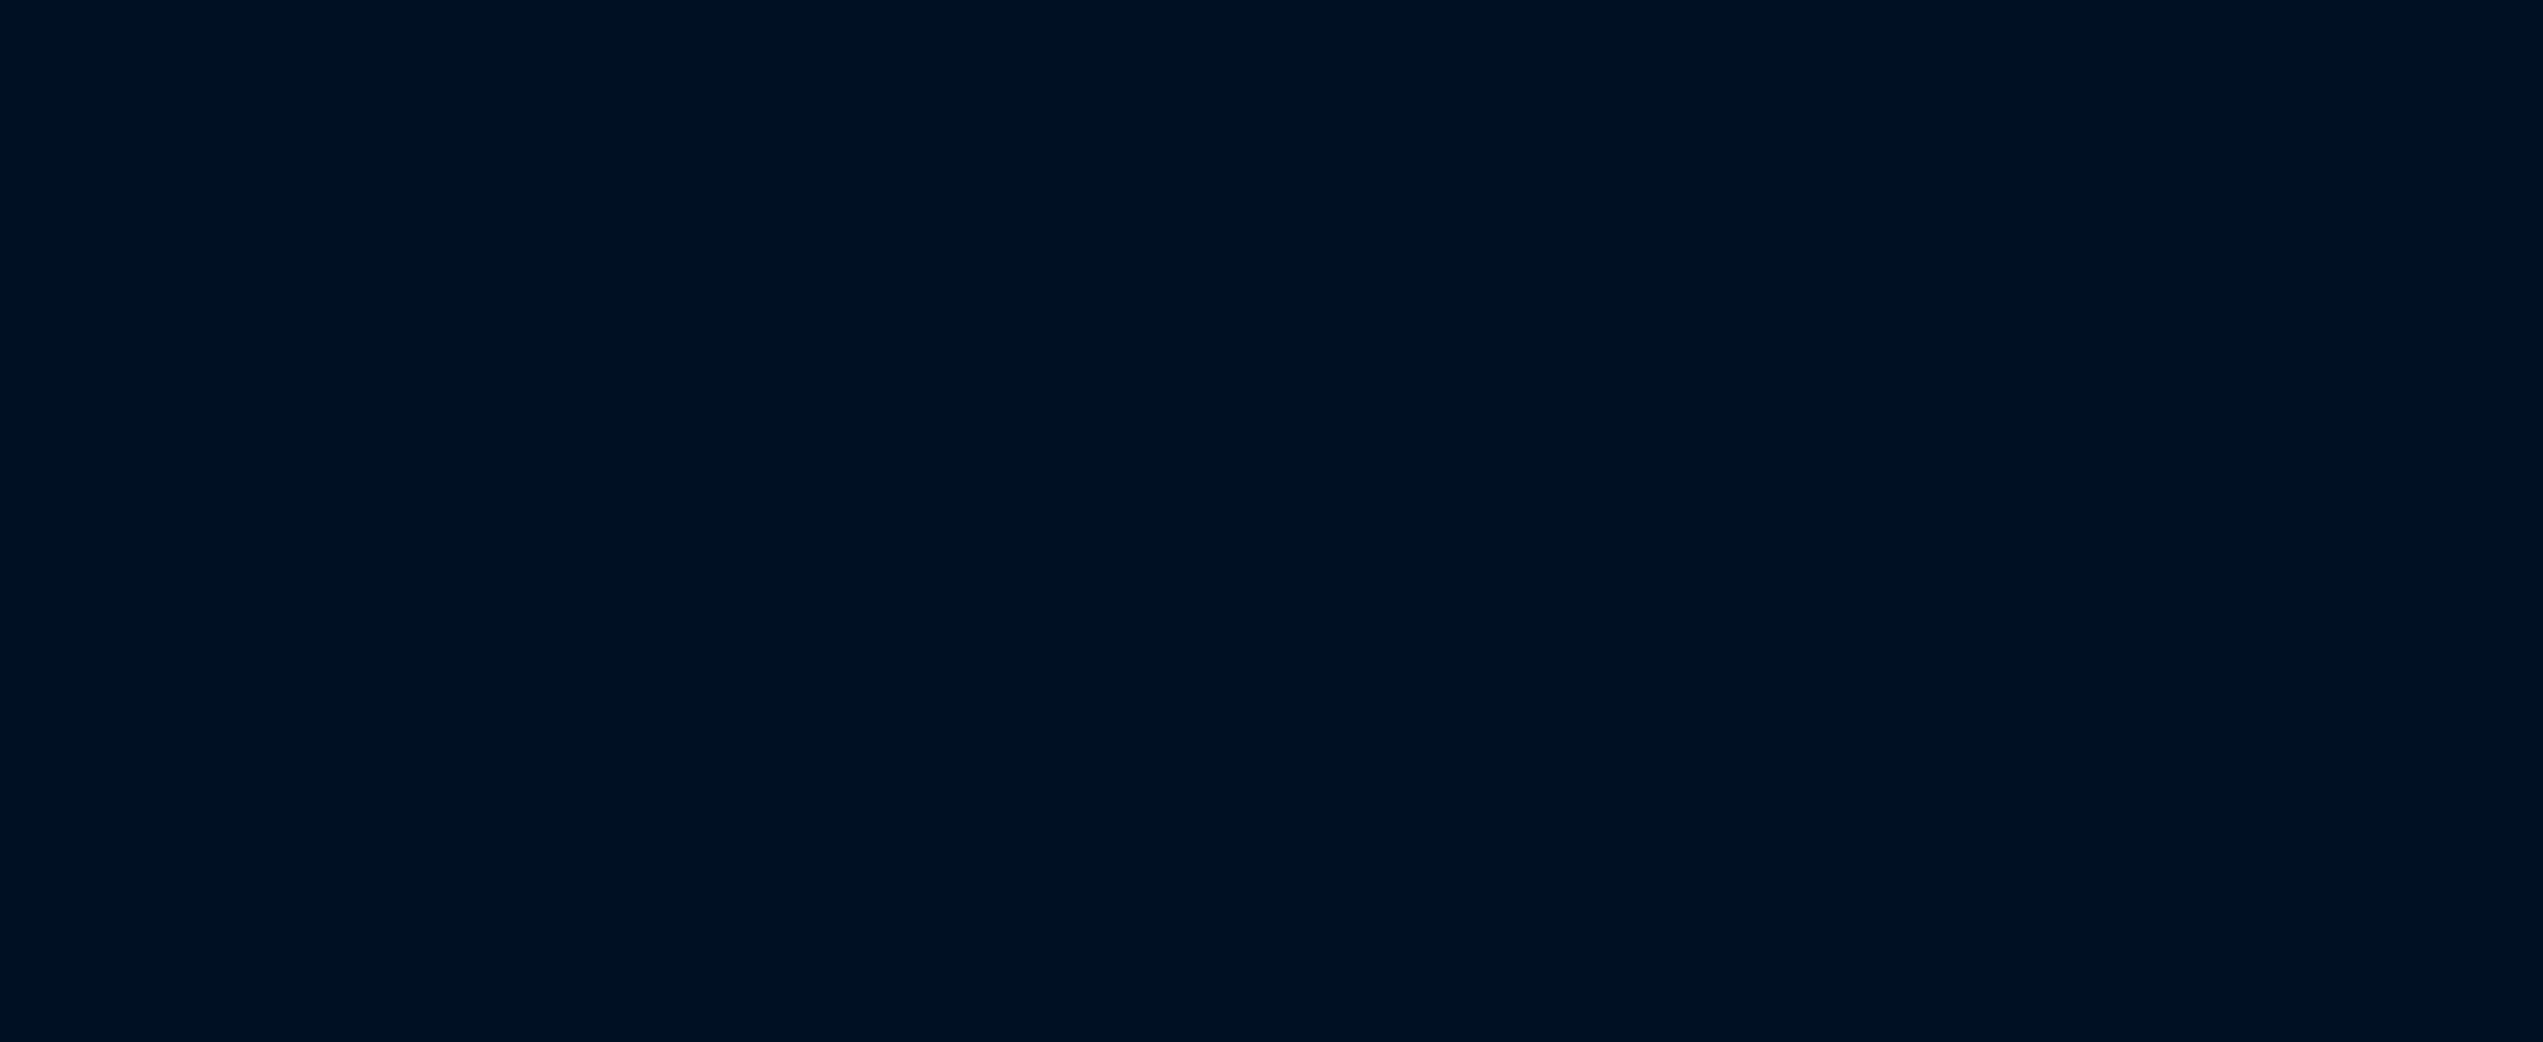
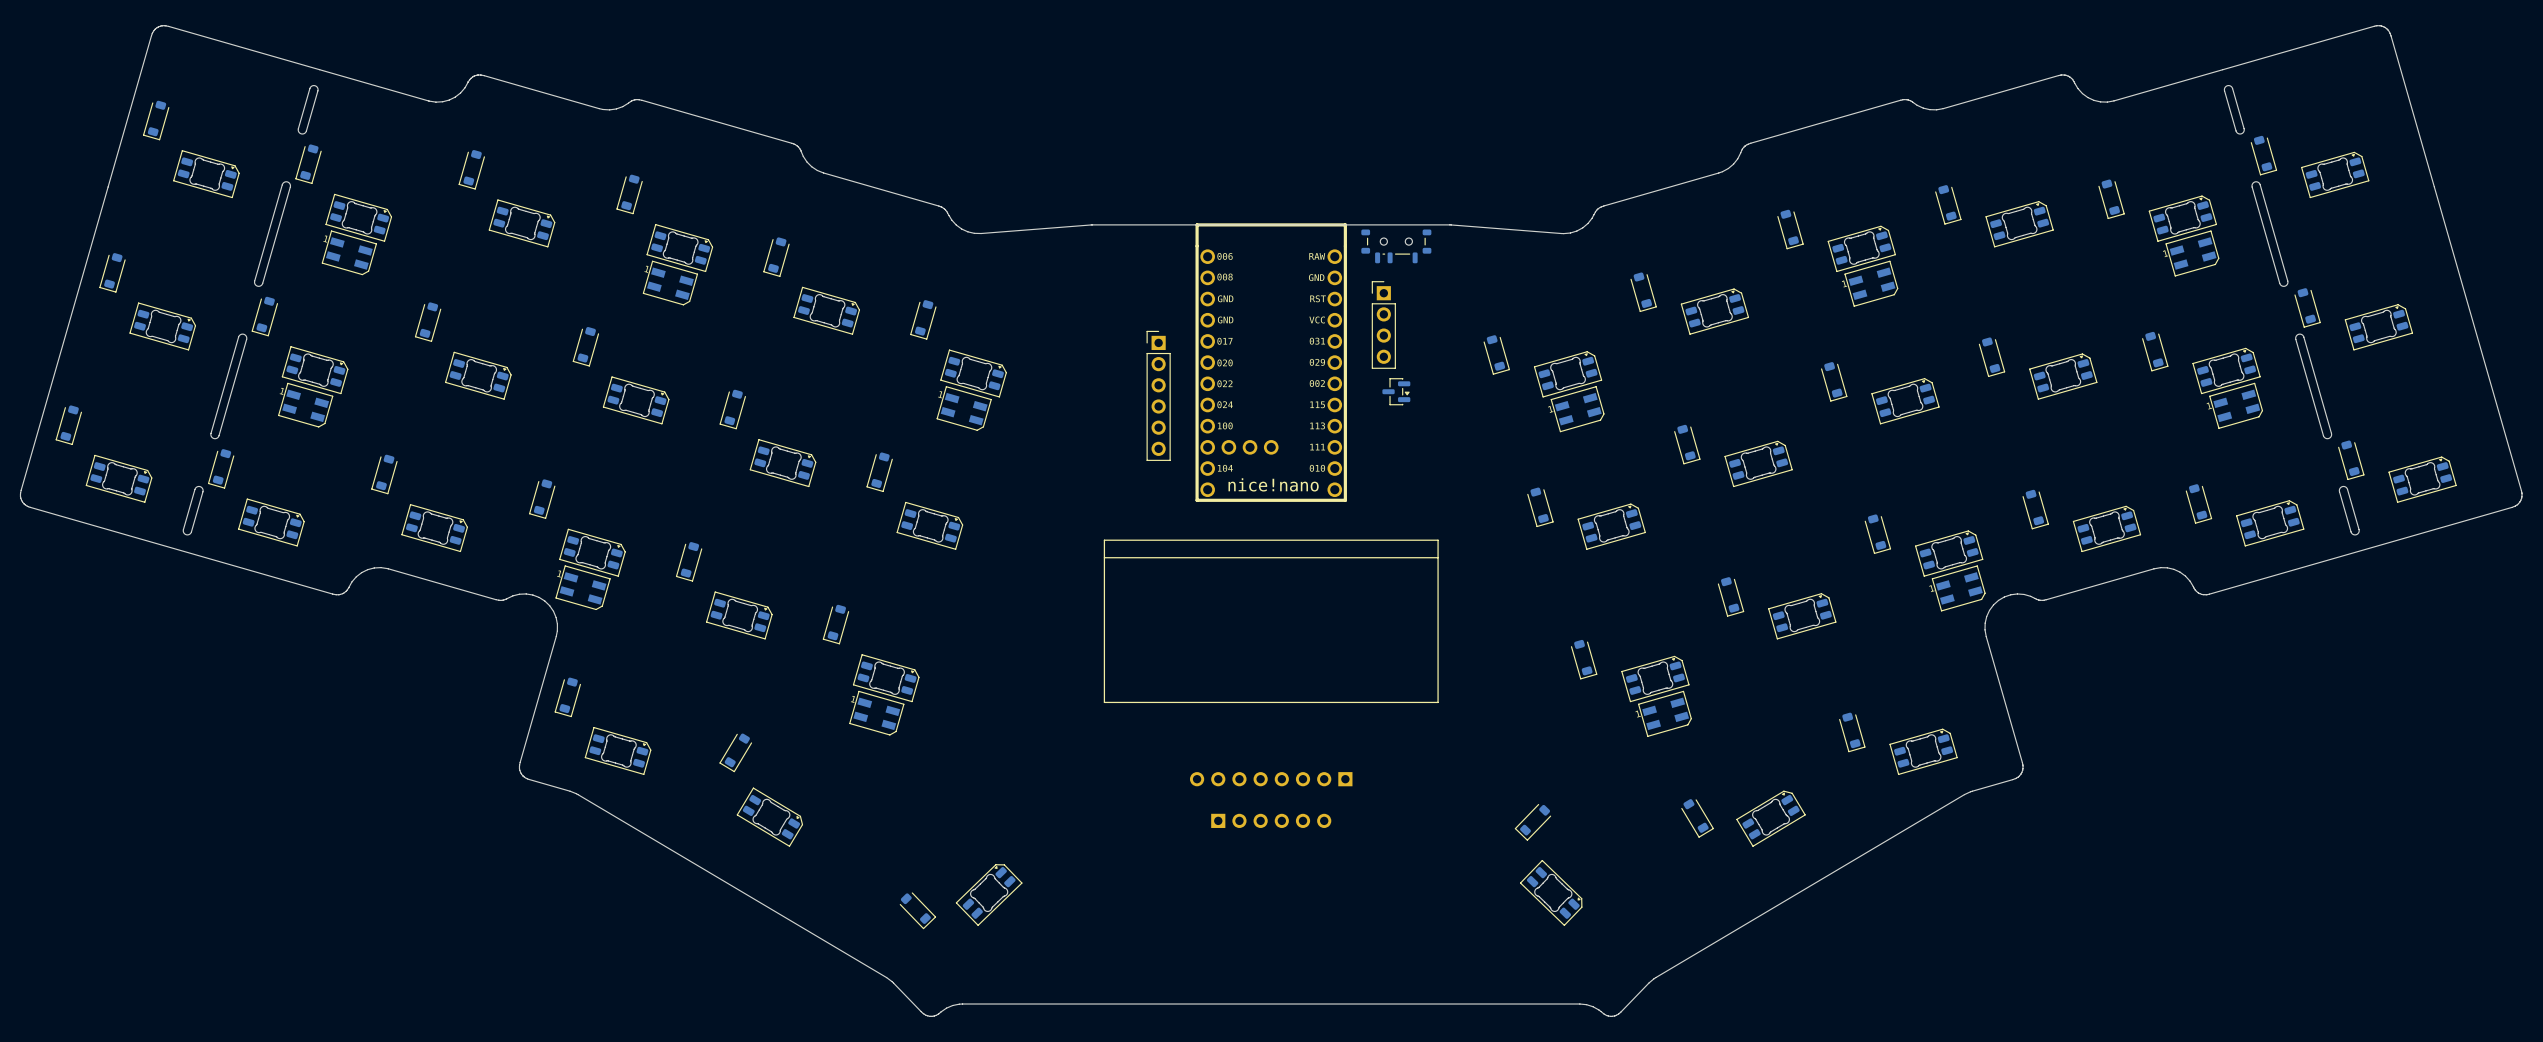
board edge: none -> (468, 81) (474, 76) (484, 75) (602, 109) (616, 108) (632, 100) (642, 100) (793, 144) (799, 148) (806, 162) (817, 170) (938, 206) (945, 209) (949, 215)
board edge: none -> (468, 82) (460, 92) (449, 100) (429, 101) (168, 26) (162, 25) (155, 29) (151, 35) (21, 490) (21, 500) (30, 507) (335, 594) (346, 591) (351, 581) (361, 572) (380, 567) (498, 600) (519, 594) (539, 597) (553, 611) (557, 630) (520, 762) (519, 768) (522, 775) (578, 794) (886, 977) (921, 1011) (930, 1016) (935, 1015) (952, 1005) (962, 1004) (1579, 1004) (1593, 1006) (1607, 1015) (1614, 1015) (1655, 977) (1964, 794) (2019, 775) (2022, 770) (2022, 762) (1985, 629) (1989, 610) (2004, 596) (2024, 594) (2044, 600) (2160, 567) (2180, 572) (2190, 581) (2198, 592) (2207, 594) (2511, 507) (2517, 504) (2521, 498) (2521, 490) (2391, 35) (2388, 30) (2381, 26) (2374, 26) (2107, 102) (2087, 97) (2077, 88) (2071, 78) (2061, 74) (1936, 109) (1923, 108) (1908, 99) (1900, 100) (1750, 143) (1742, 148) (1733, 164) (1722, 171) (1603, 205) (1598, 208) (1594, 214)
board edge: none -> (309, 88) (298, 129) (301, 133) (306, 131) (318, 90) (314, 85) (309, 88)
board edge: none -> (2232, 88) (2244, 129) (2240, 133) (2236, 131) (2224, 90) (2227, 85) (2232, 88)
part: none -> (156, 120)
part: none -> (2263, 155)
part: none -> (308, 164)
part: none -> (471, 169)
part: none -> (206, 174)
part: none -> (2335, 174)
board edge: none -> (282, 184) (254, 281) (257, 286) (262, 283) (290, 187) (287, 181) (282, 184)
board edge: none -> (2260, 184) (2287, 281) (2284, 286) (2279, 283) (2252, 187) (2255, 181) (2260, 184)
part: none -> (629, 194)
part: none -> (2111, 199)
part: none -> (1948, 204)
board edge: none -> (1593, 214) (1582, 227) (1563, 233) (1449, 224) (1092, 224) (974, 233) (961, 229) (949, 215)
part: none -> (358, 217)
part: none -> (2182, 218)
part: none -> (522, 223)
part: none -> (2019, 224)
part: none -> (1790, 229)
part: none -> (1396, 246)
part: none -> (679, 248)
part: none -> (1861, 248)
part: none -> (349, 252)
part: none -> (2192, 253)
part: none -> (776, 257)
part: none -> (112, 272)
part: none -> (670, 283)
part: none -> (1871, 283)
part: none -> (1643, 292)
part: none -> (2307, 307)
part: none -> (826, 310)
part: none -> (1714, 311)
part: none -> (264, 316)
part: none -> (923, 319)
part: none -> (428, 322)
part: none -> (1383, 324)
part: none -> (162, 326)
part: none -> (2378, 327)
board edge: none -> (238, 337) (211, 433) (213, 438) (219, 435) (246, 339) (243, 334) (238, 337)
board edge: none -> (2303, 337) (2331, 433) (2328, 438) (2323, 435) (2295, 339) (2298, 334) (2303, 337)
part: none -> (585, 346)
part: none -> (2155, 351)
part: none -> (1496, 354)
part: none -> (1992, 357)
part: none -> (1271, 362)
part: none -> (315, 370)
part: none -> (2226, 370)
part: none -> (973, 373)
part: none -> (1568, 374)
part: none -> (478, 375)
part: none -> (2063, 376)
part: none -> (1834, 381)
part: none -> (1396, 391)
part: none -> (1158, 395)
part: none -> (636, 400)
part: none -> (1905, 401)
part: none -> (305, 405)
part: none -> (2236, 405)
part: none -> (964, 408)
part: none -> (732, 409)
part: none -> (1577, 409)
part: none -> (68, 425)
part: none -> (1687, 444)
part: none -> (2351, 460)
part: none -> (783, 463)
part: none -> (1758, 463)
part: none -> (221, 468)
part: none -> (879, 472)
part: none -> (384, 474)
part: none -> (119, 478)
part: none -> (2422, 479)
board edge: none -> (194, 489) (183, 530) (186, 534) (191, 532) (203, 491) (199, 486) (194, 489)
board edge: none -> (2347, 489) (2359, 530) (2355, 534) (2351, 532) (2339, 491) (2342, 486) (2347, 489)
part: none -> (542, 499)
part: none -> (2198, 503)
part: none -> (1540, 507)
part: none -> (2035, 509)
part: none -> (271, 522)
part: none -> (2270, 523)
part: none -> (929, 525)
part: none -> (1611, 526)
part: none -> (434, 528)
part: none -> (2106, 528)
part: none -> (1877, 534)
line: none -> (1438, 540) (1104, 540) (1104, 702) (1438, 702) (1438, 540)
part: none -> (592, 552)
part: none -> (1949, 553)
line: none -> (1438, 557) (1104, 557)
part: none -> (689, 561)
part: none -> (583, 587)
part: none -> (1958, 588)
part: none -> (1731, 596)
part: none -> (739, 615)
part: none -> (1802, 616)
part: none -> (835, 624)
part: none -> (1584, 659)
part: none -> (886, 678)
part: none -> (1655, 679)
part: none -> (567, 697)
part: none -> (876, 713)
part: none -> (1664, 713)
part: none -> (1852, 732)
part: none -> (618, 750)
part: none -> (1923, 751)
part: none -> (735, 752)
part: none -> (1271, 779)
part: none -> (769, 817)
part: none -> (1697, 818)
part: none -> (1771, 818)
part: none -> (1271, 820)
part: none -> (1533, 822)
part: none -> (1551, 892)
part: none -> (989, 895)
part: none -> (917, 910)

